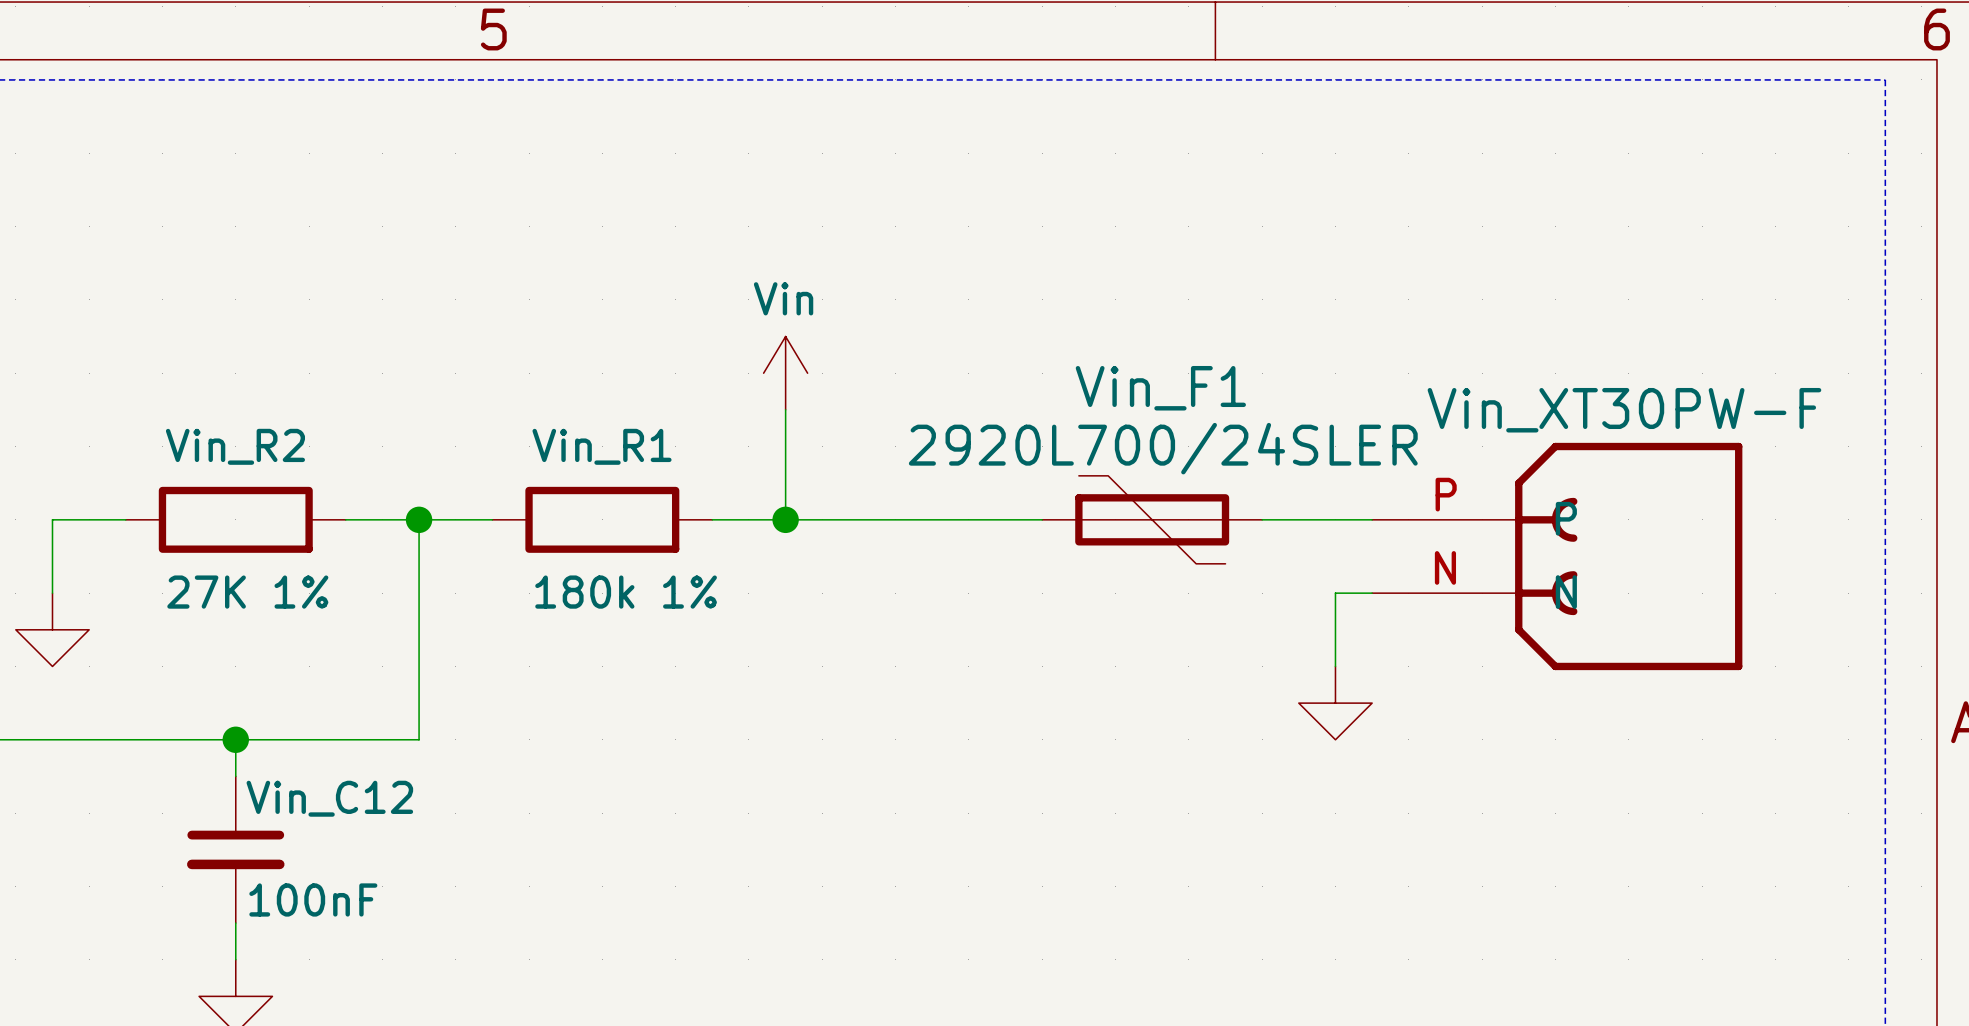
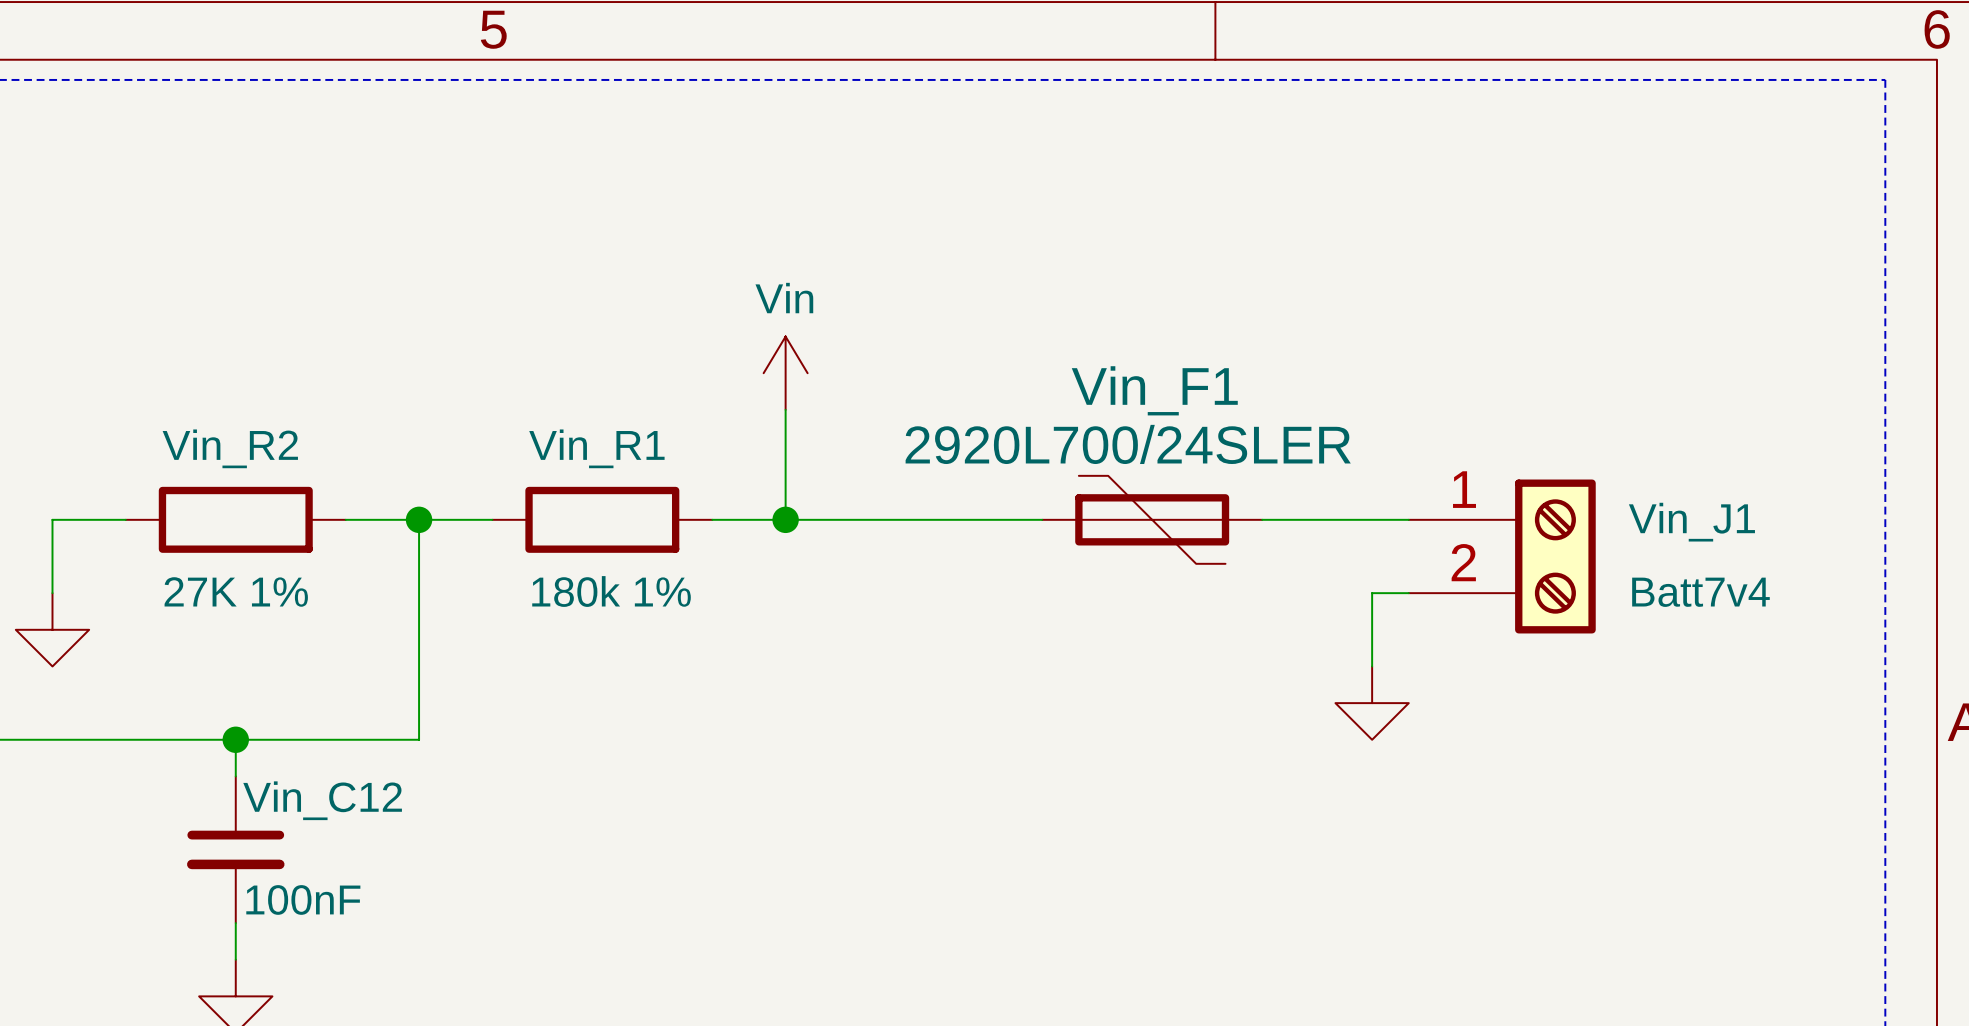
Vin_J1: none -> Batt7v4 (1502, 556)
part: Vin_XT30PW-F (1557, 556) -> none
wire: (1372, 593) (1335, 593) (1335, 666) -> (1408, 593) (1372, 593) (1372, 666)
power symbol position: (1335, 703) -> (1372, 703)

